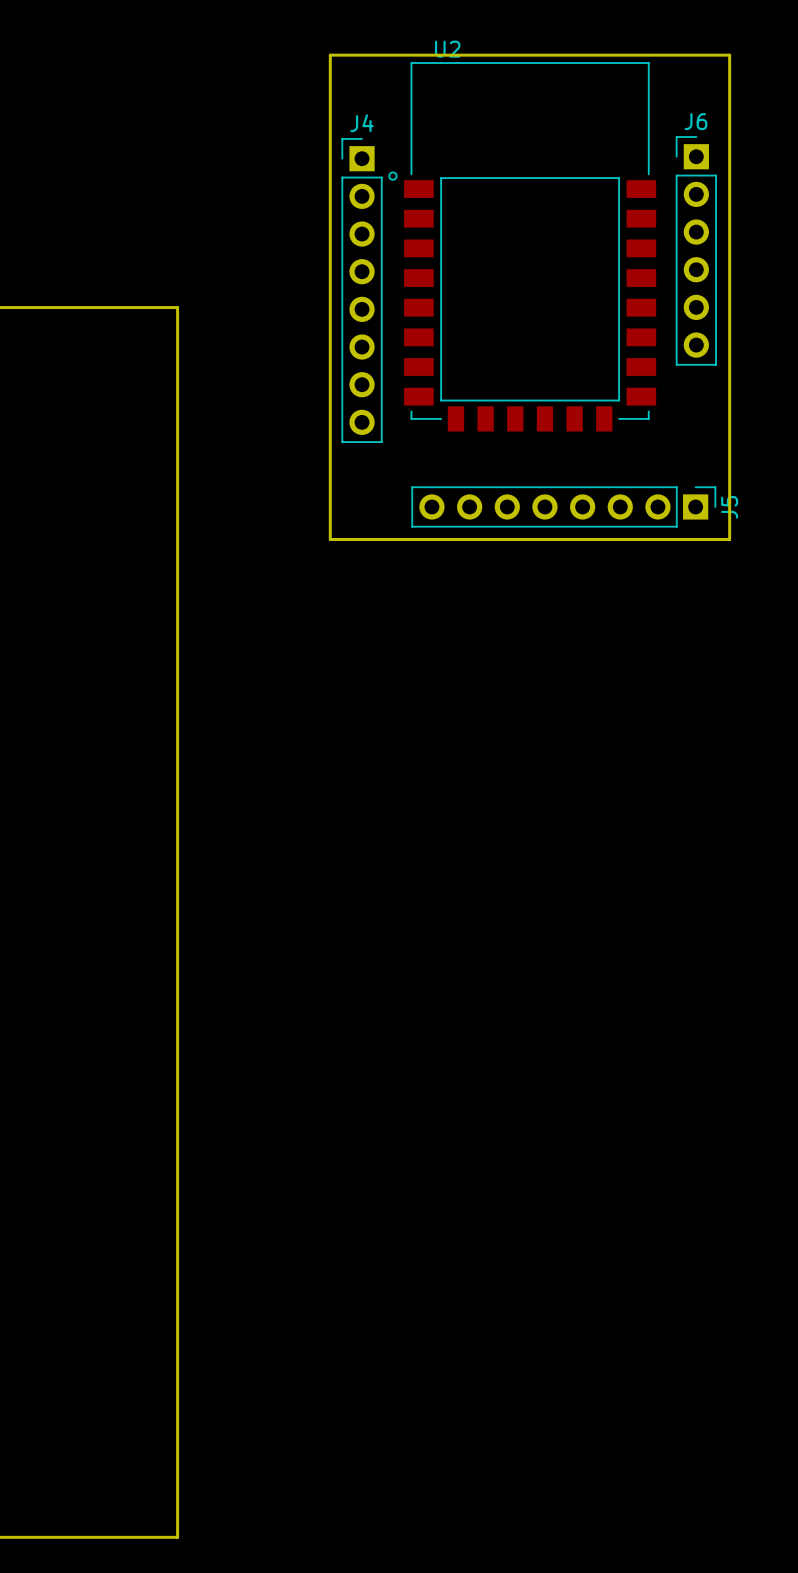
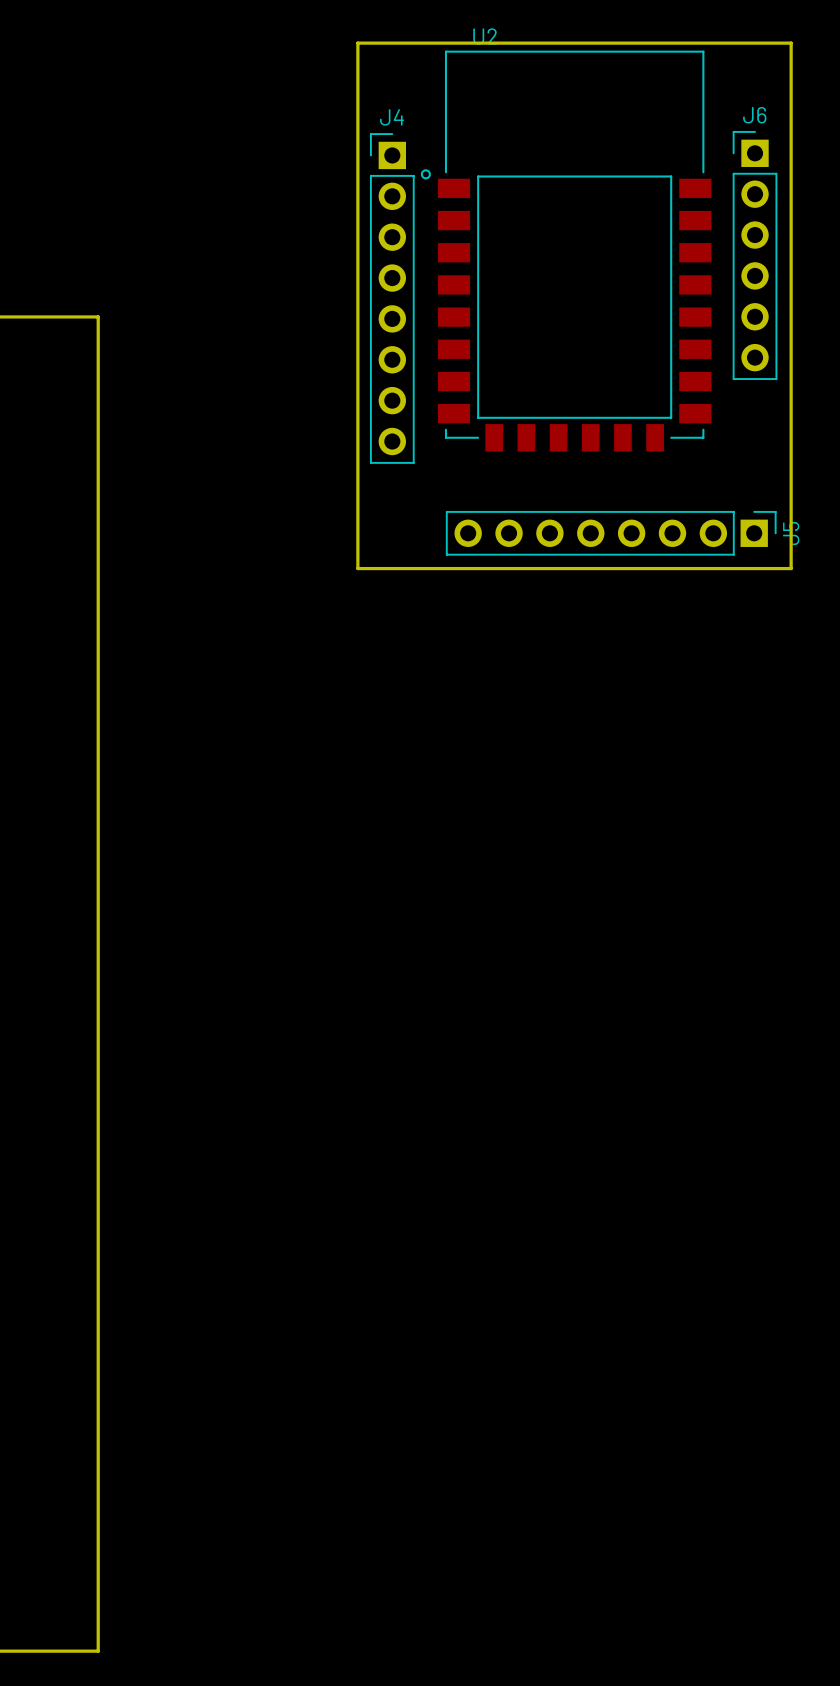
board edge: (90, 307) (177, 307) (177, 1537) (90, 1537) -> (98, 316) (98, 1651)

